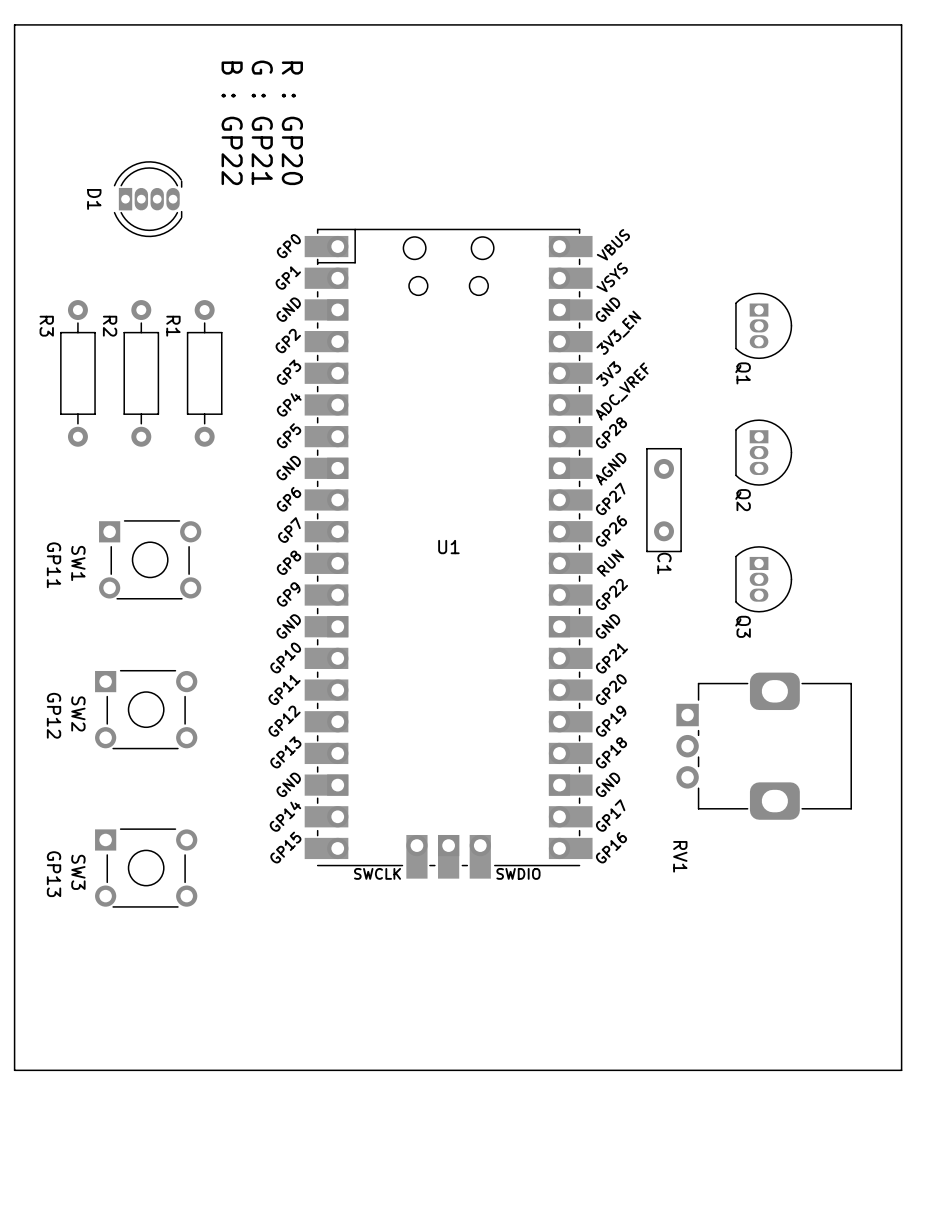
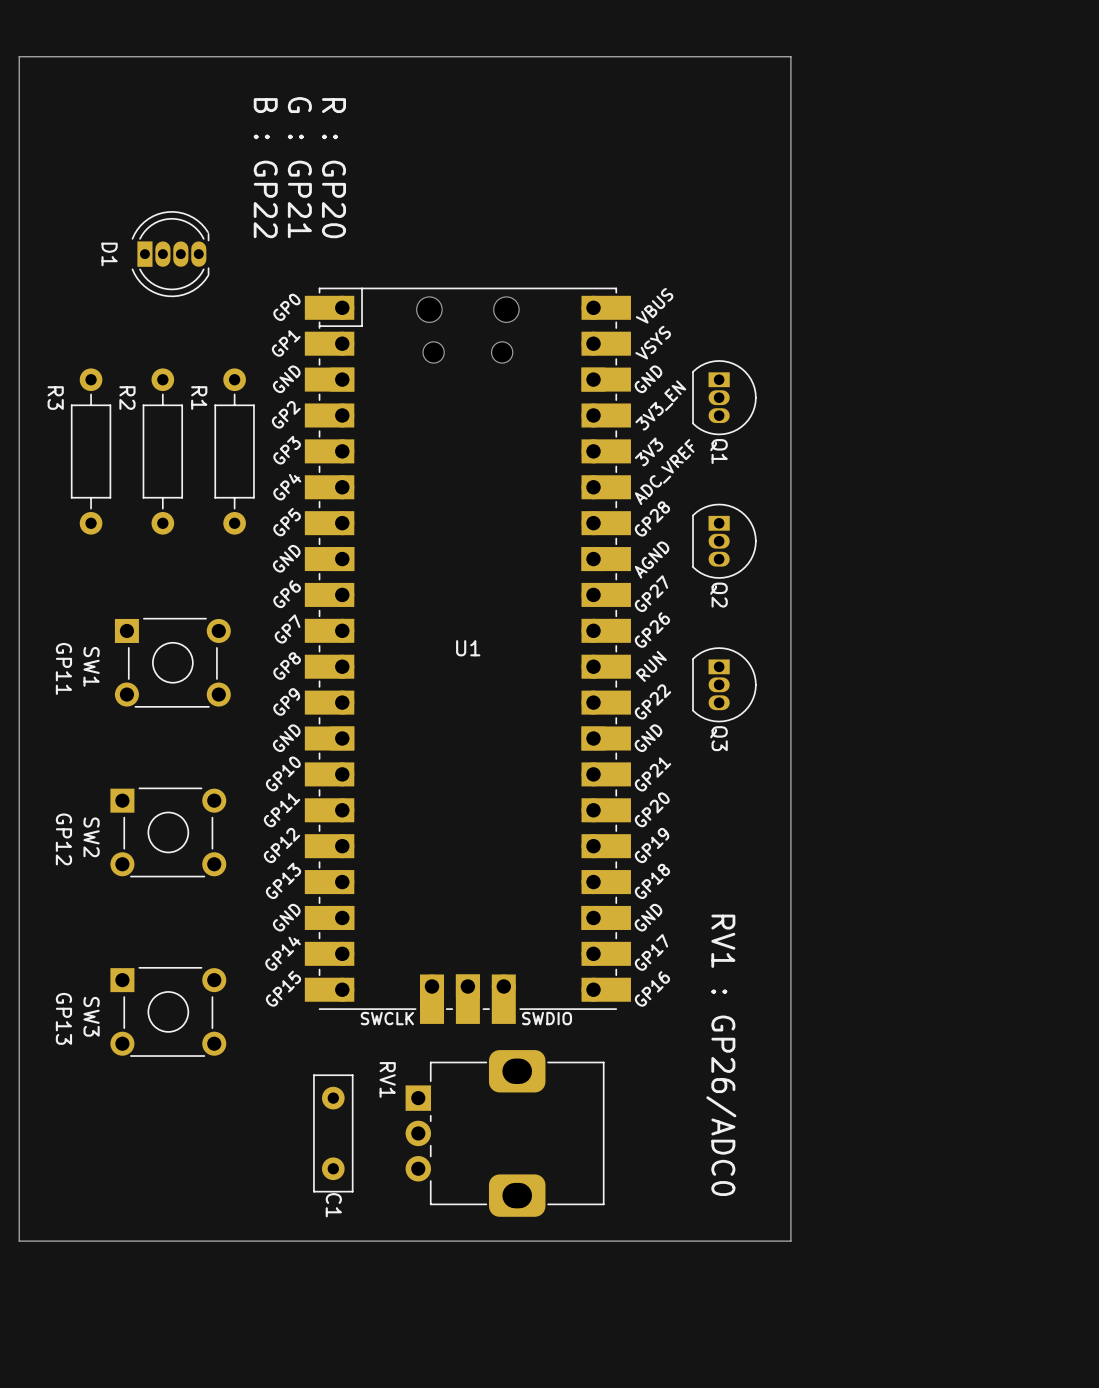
board edge: (695, 24) (901, 24) (901, 1070) (695, 1070) -> (790, 56) (790, 1241)
Q1 position: (763, 325) -> (724, 397)
Q1 name position: Q1 (743, 373) -> Q1 (718, 451)
Q2 position: (763, 452) -> (724, 541)
C1 position: (664, 500) -> (333, 1133)
Q2 name position: Q2 (743, 500) -> Q2 (718, 595)
U1 position: (448, 553) -> (467, 655)
Q3 position: (763, 579) -> (724, 684)
Q3 name position: Q3 (743, 626) -> Q3 (718, 738)
RV1 position: (764, 746) -> (505, 1133)
RV1 name position: RV1 (680, 856) -> RV1 (387, 1079)
text: none -> RV1 : GP26/ADC0 (721, 1055)

